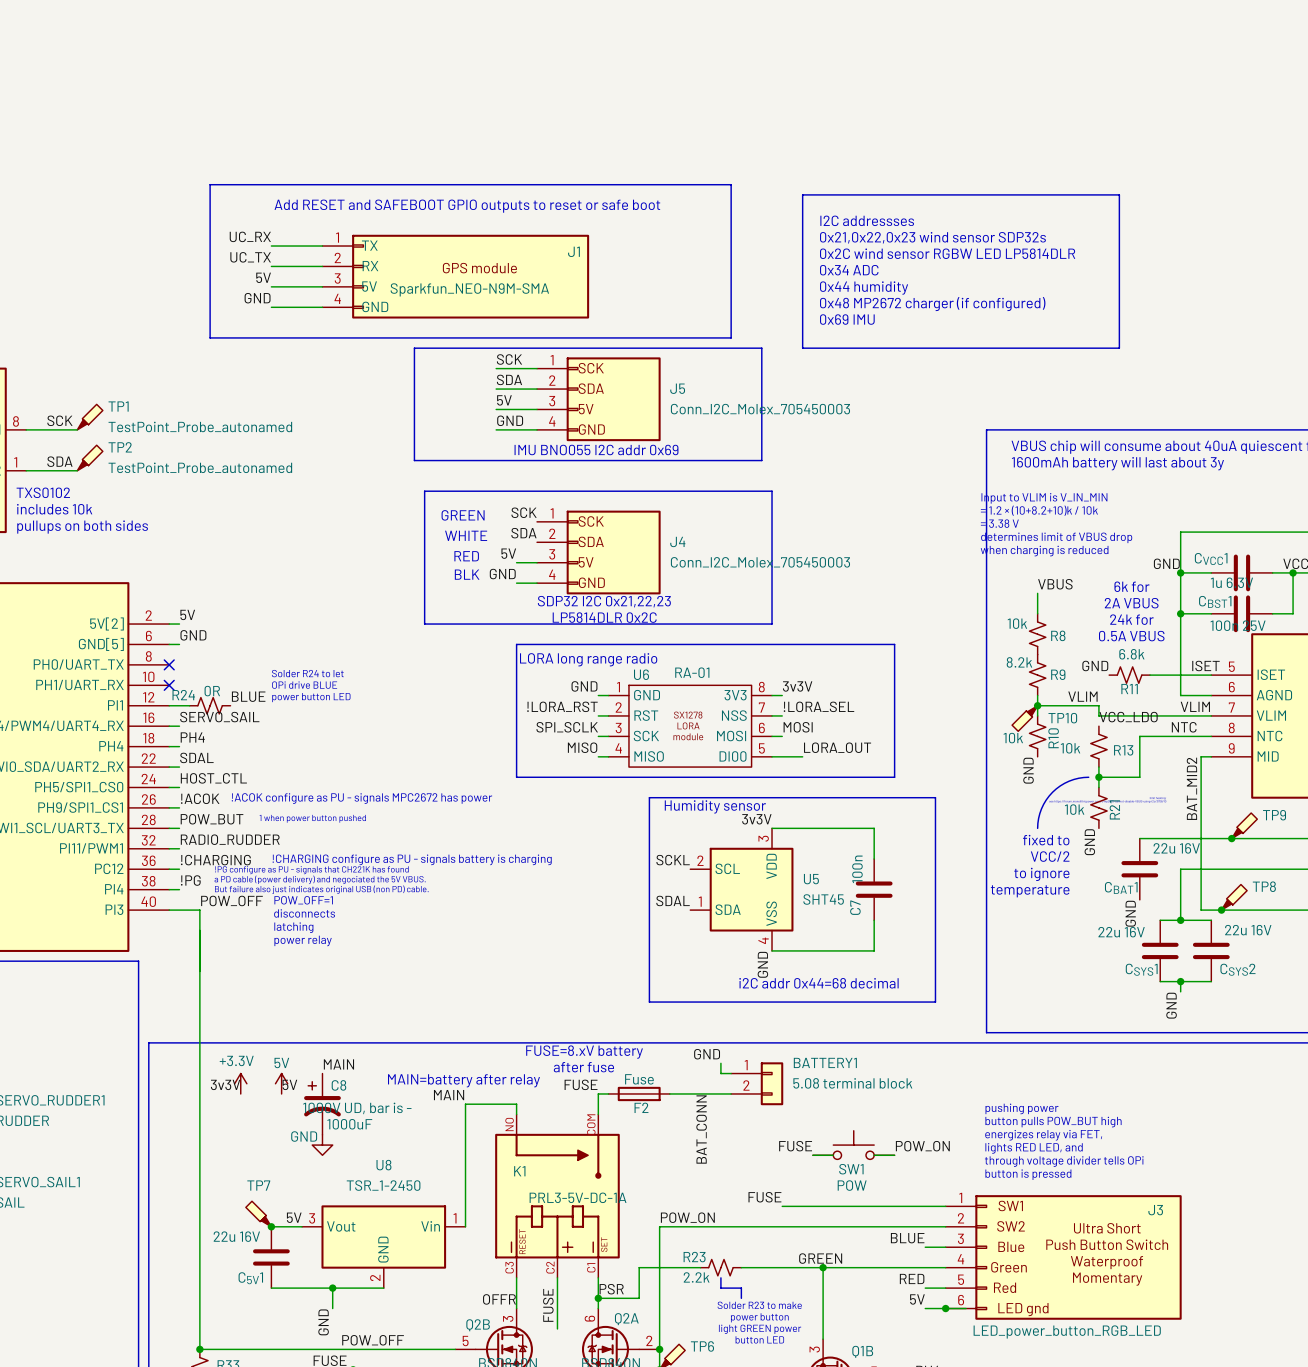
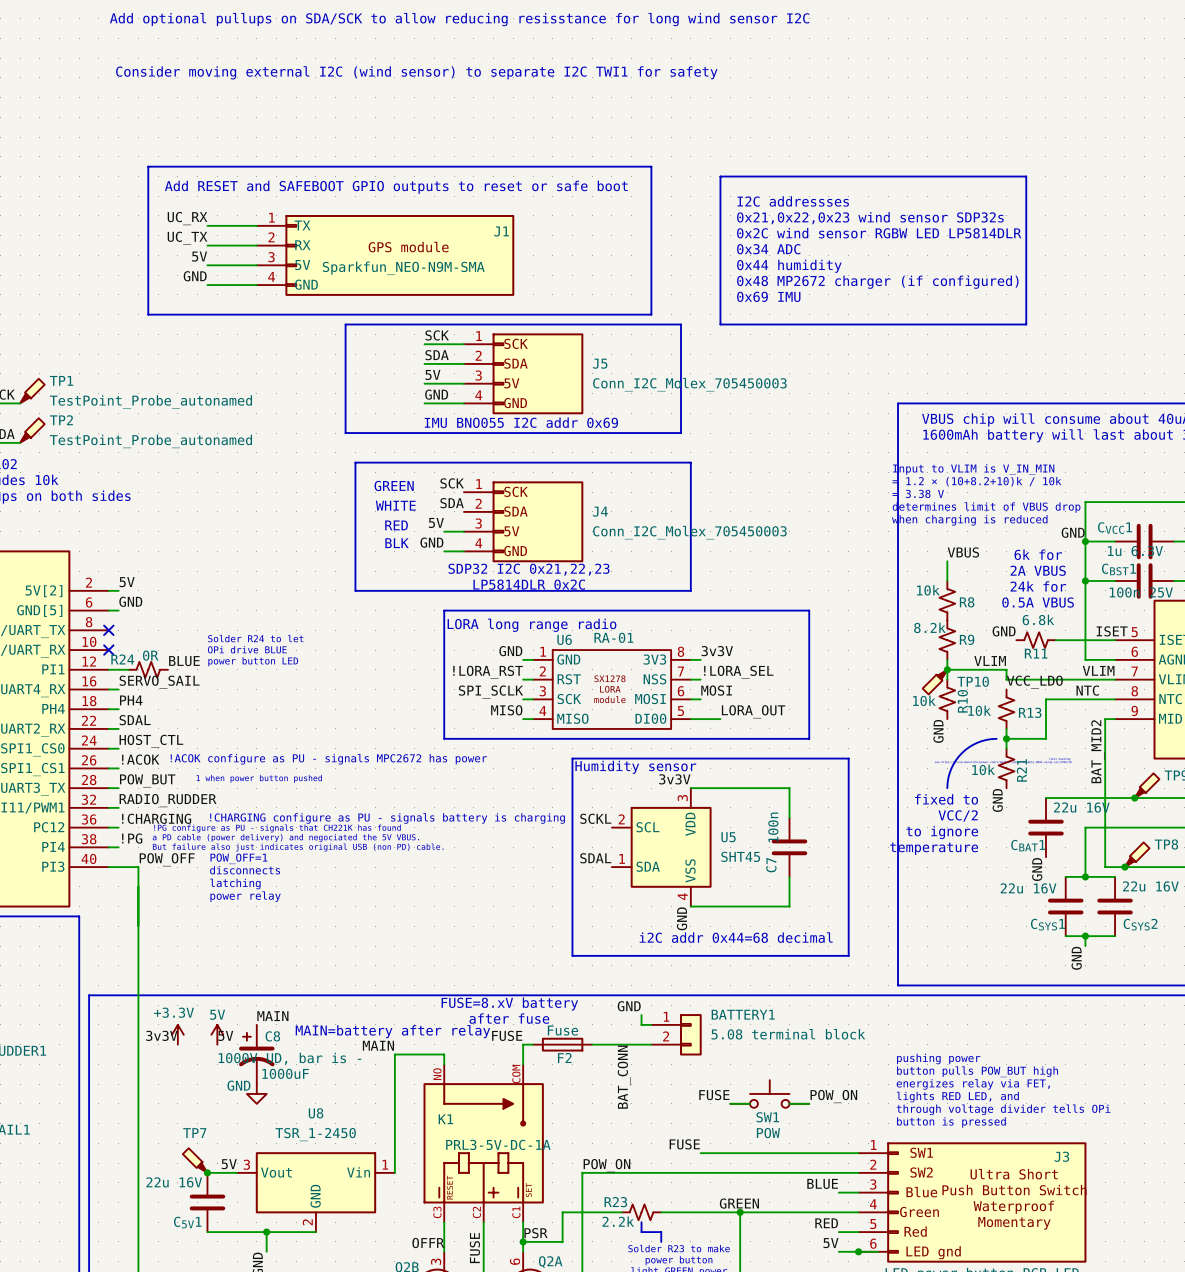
text: none -> Add optional pullups on SDA/SCK to allow reducing resisstance for long wind sensor I2C (459, 19)
text: none -> Consider moving external I2C (wind sensor) to separate I2C TWI1 for safety (416, 72)

